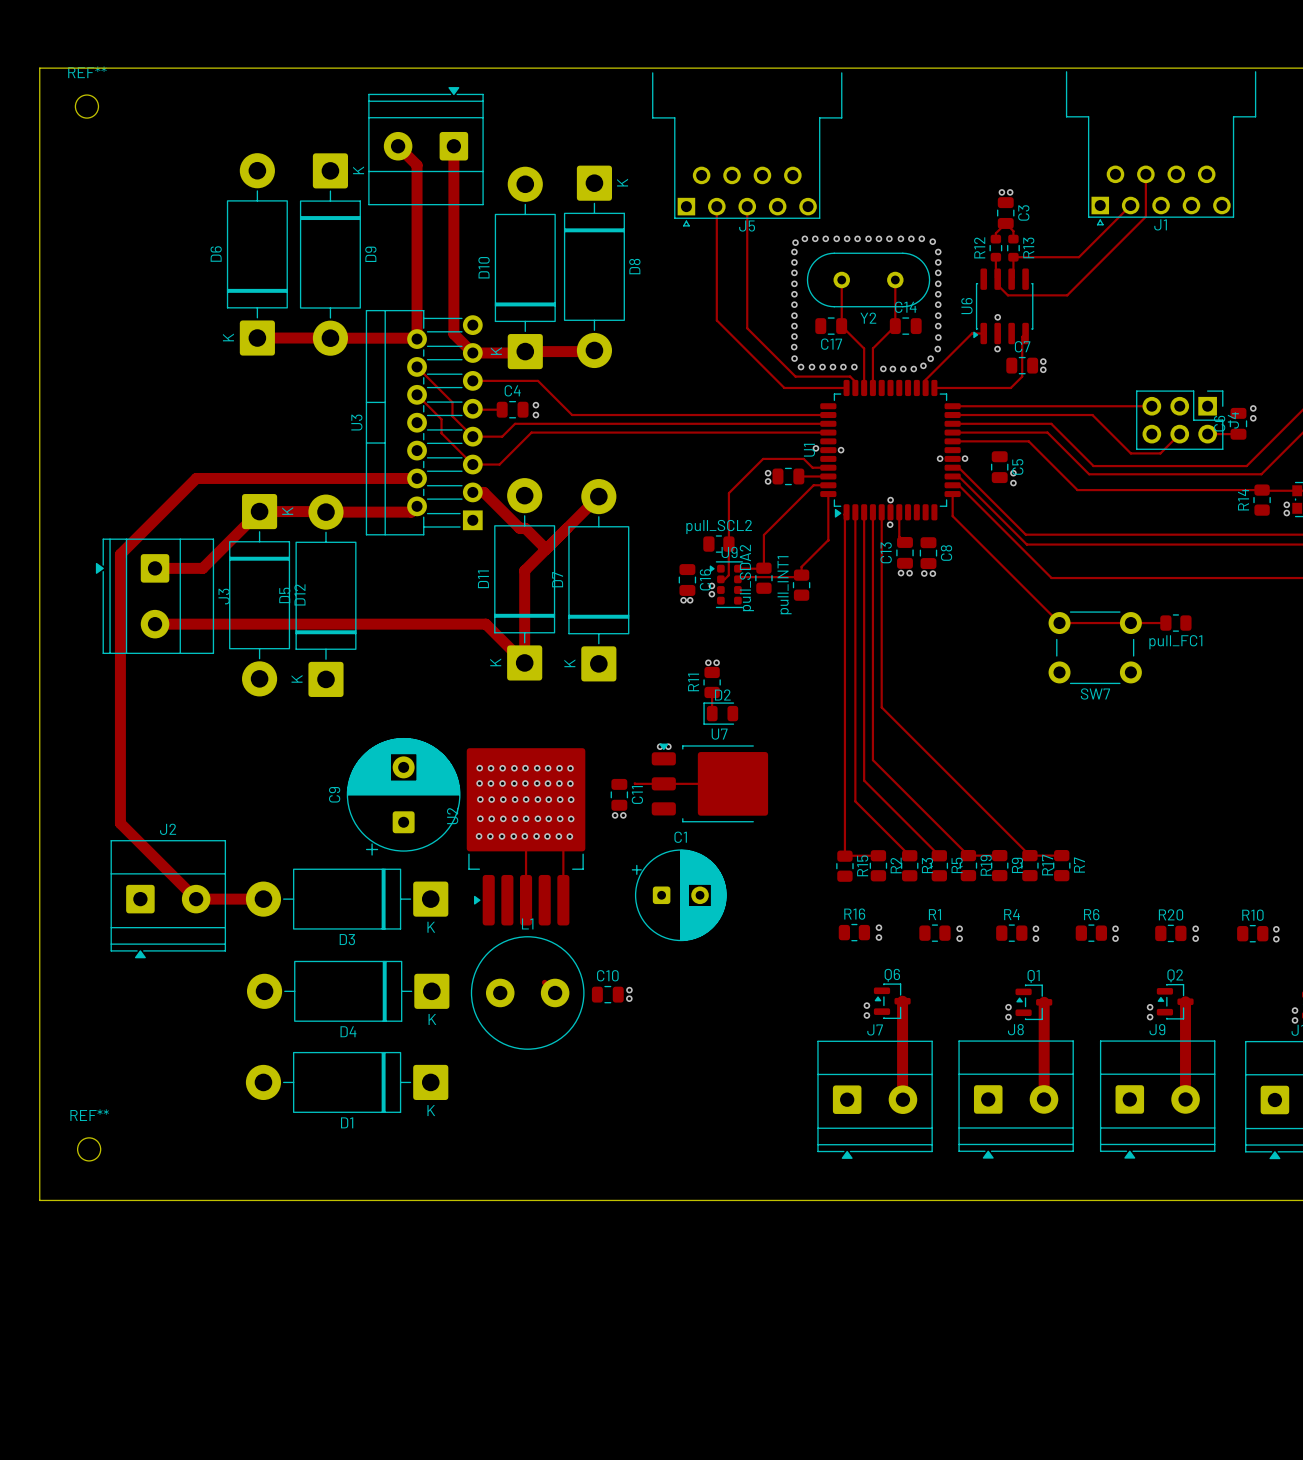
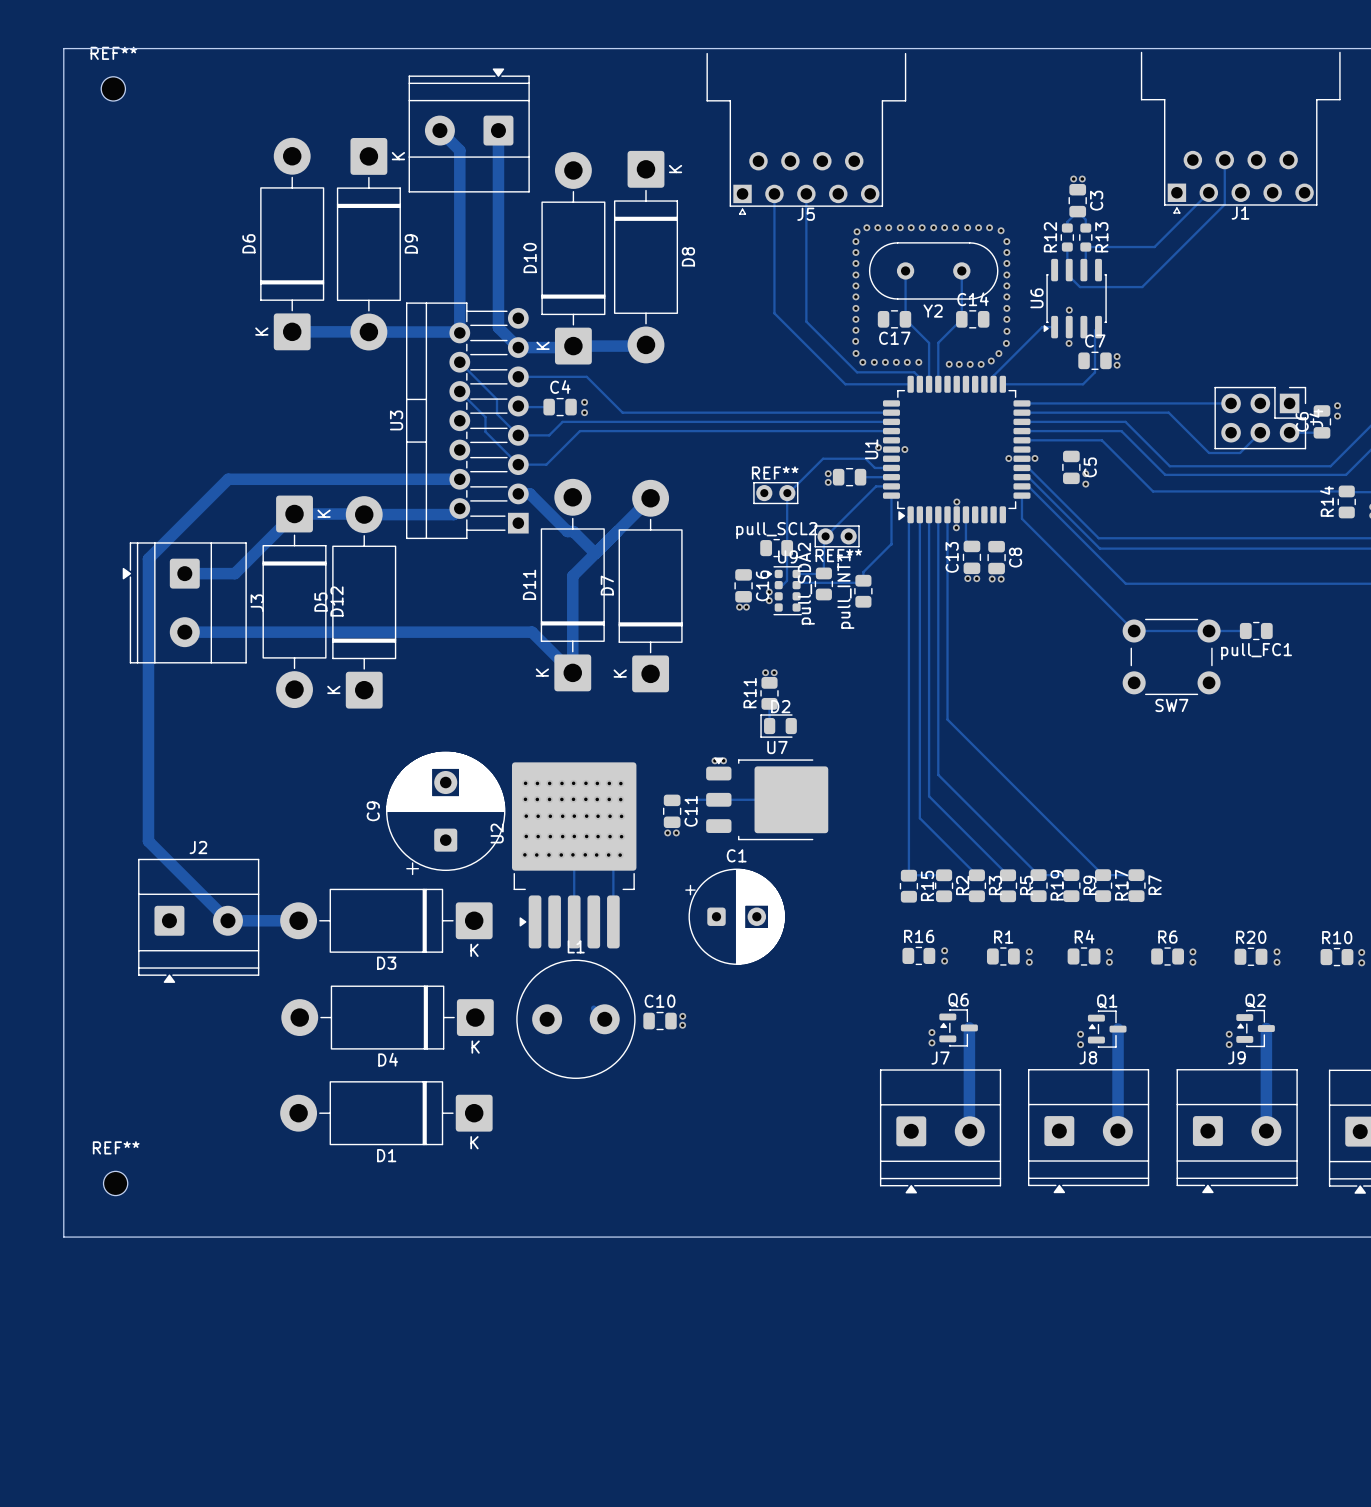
REF**: none -> (775, 493)
REF**: none -> (837, 536)

